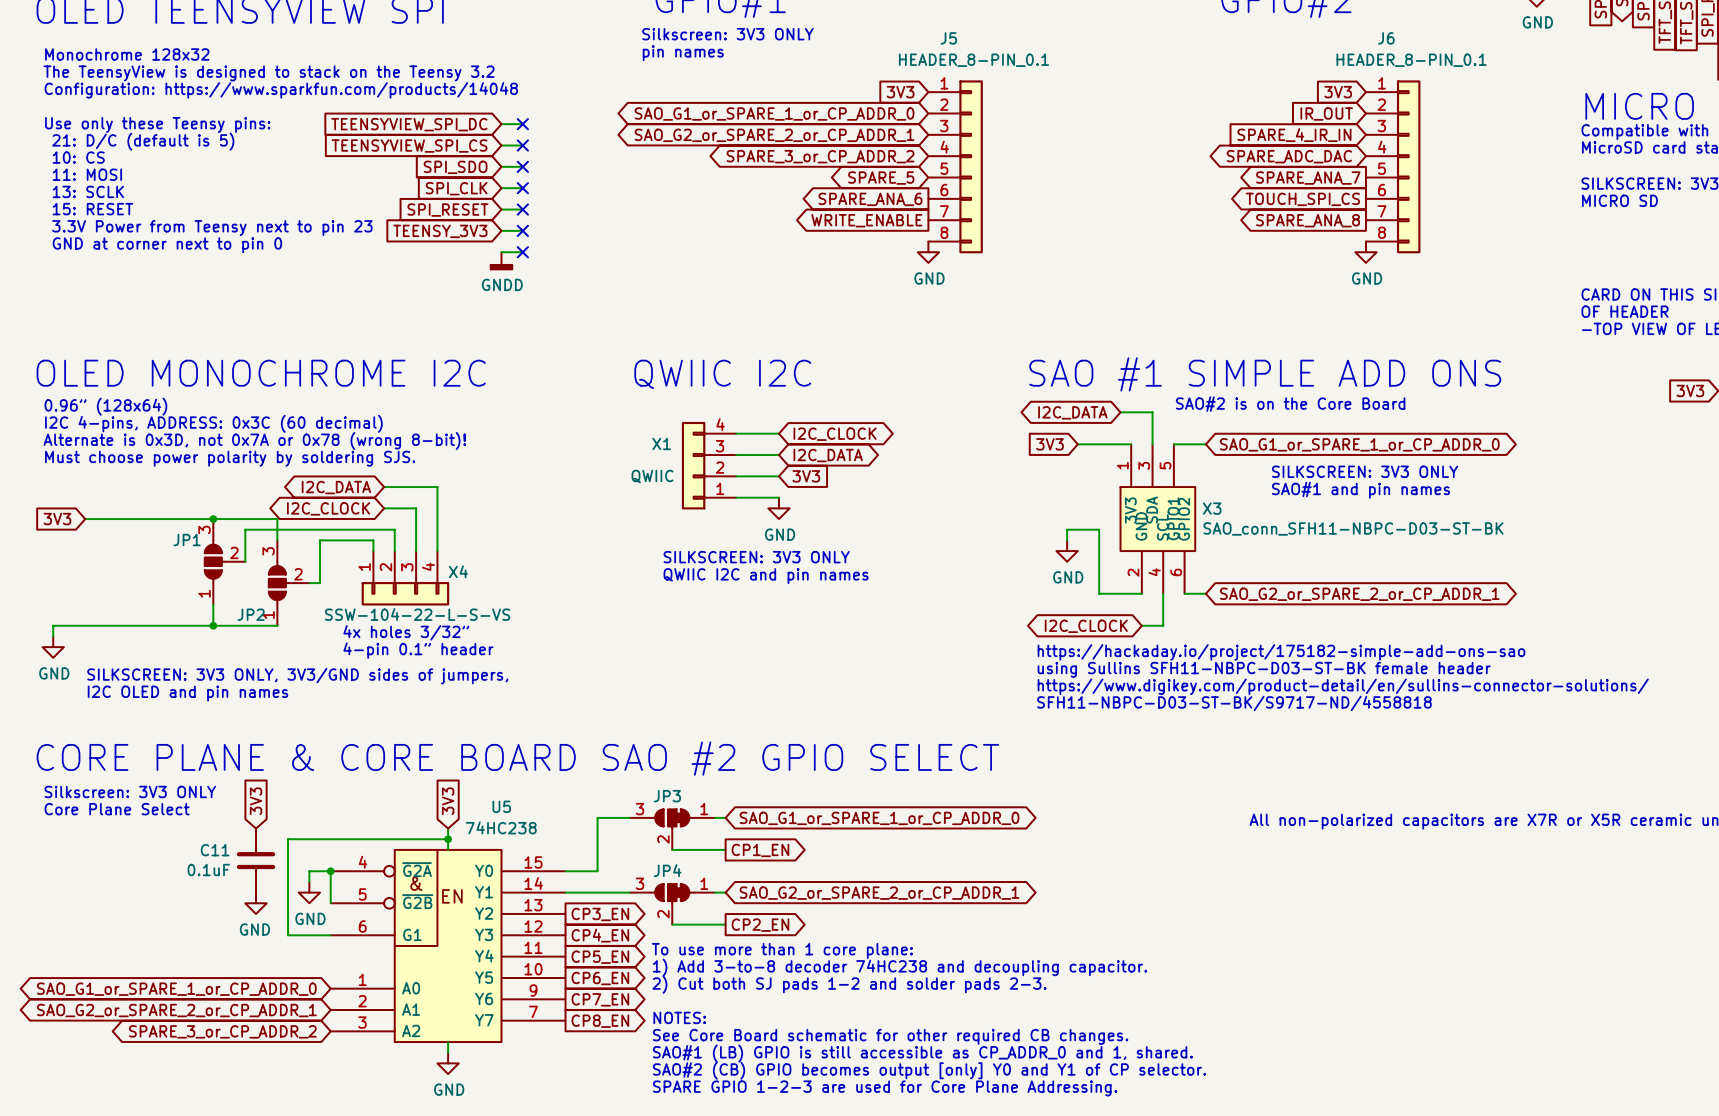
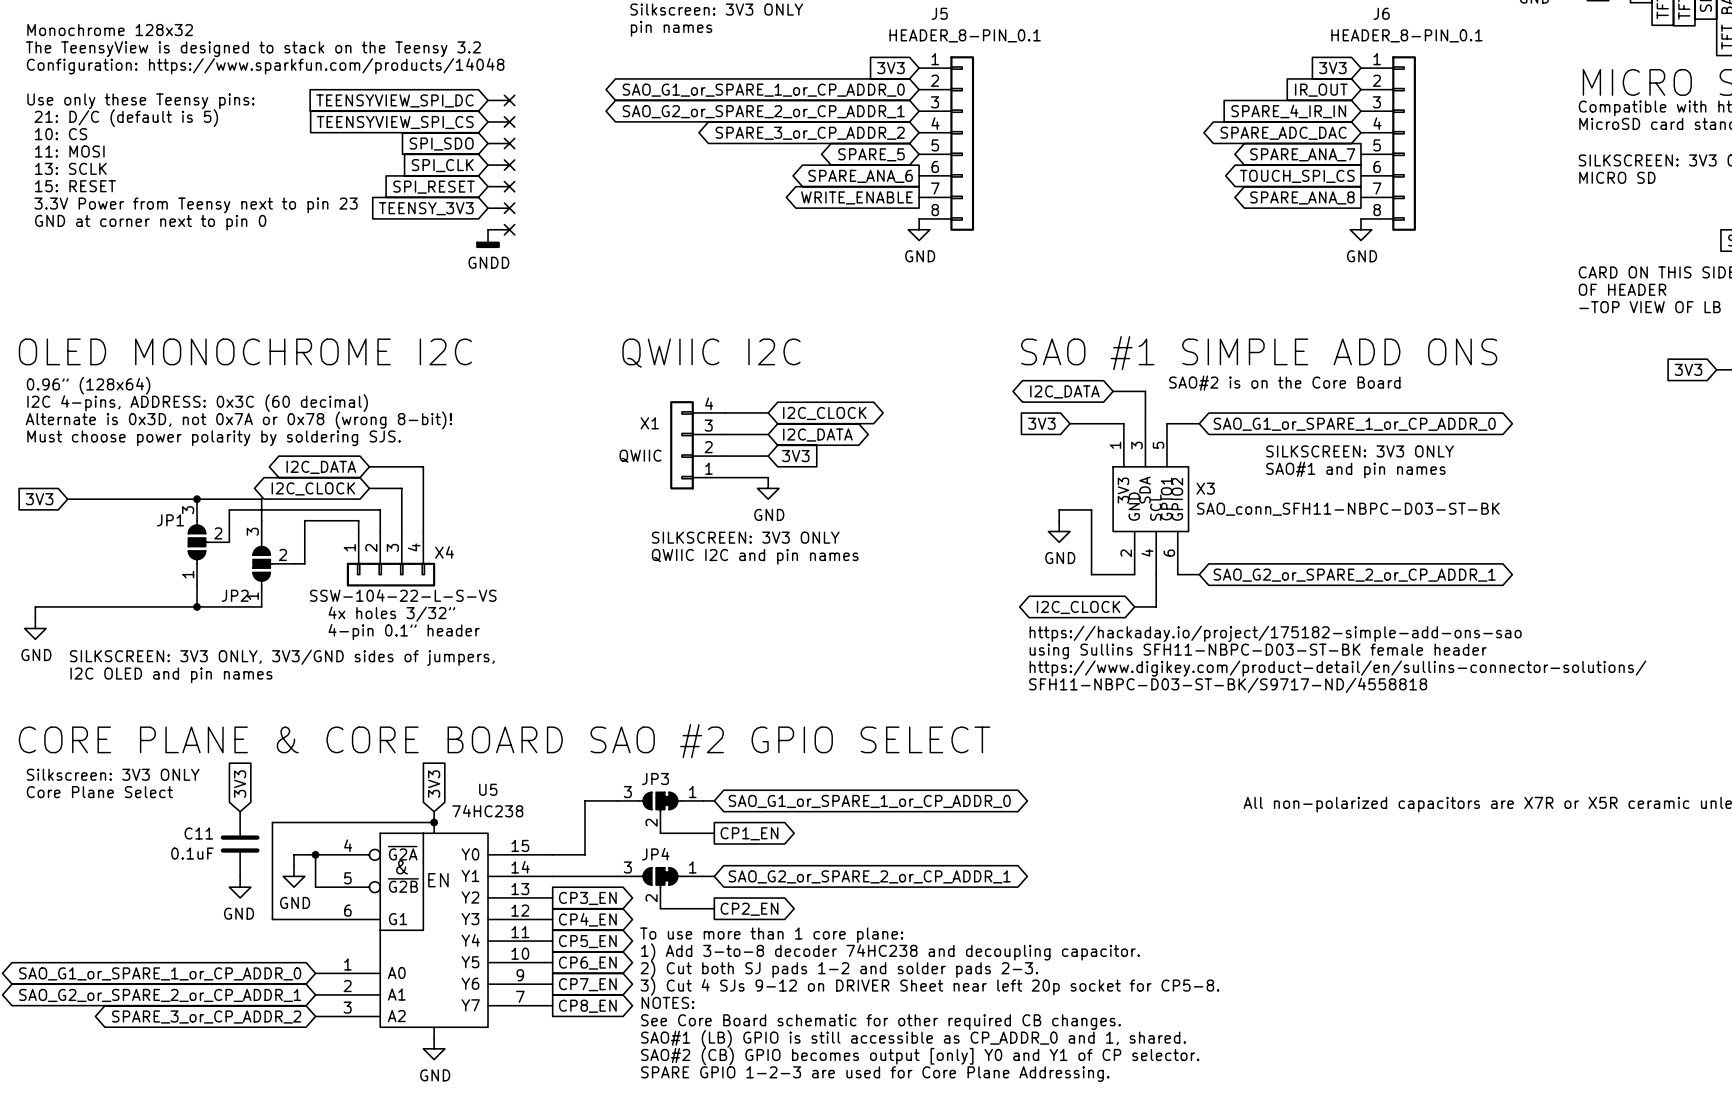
text: none -> 3) Cut 4 SJs 9-12 on DRIVER Sheet near left 20p socket for CP5-8. (929, 986)

